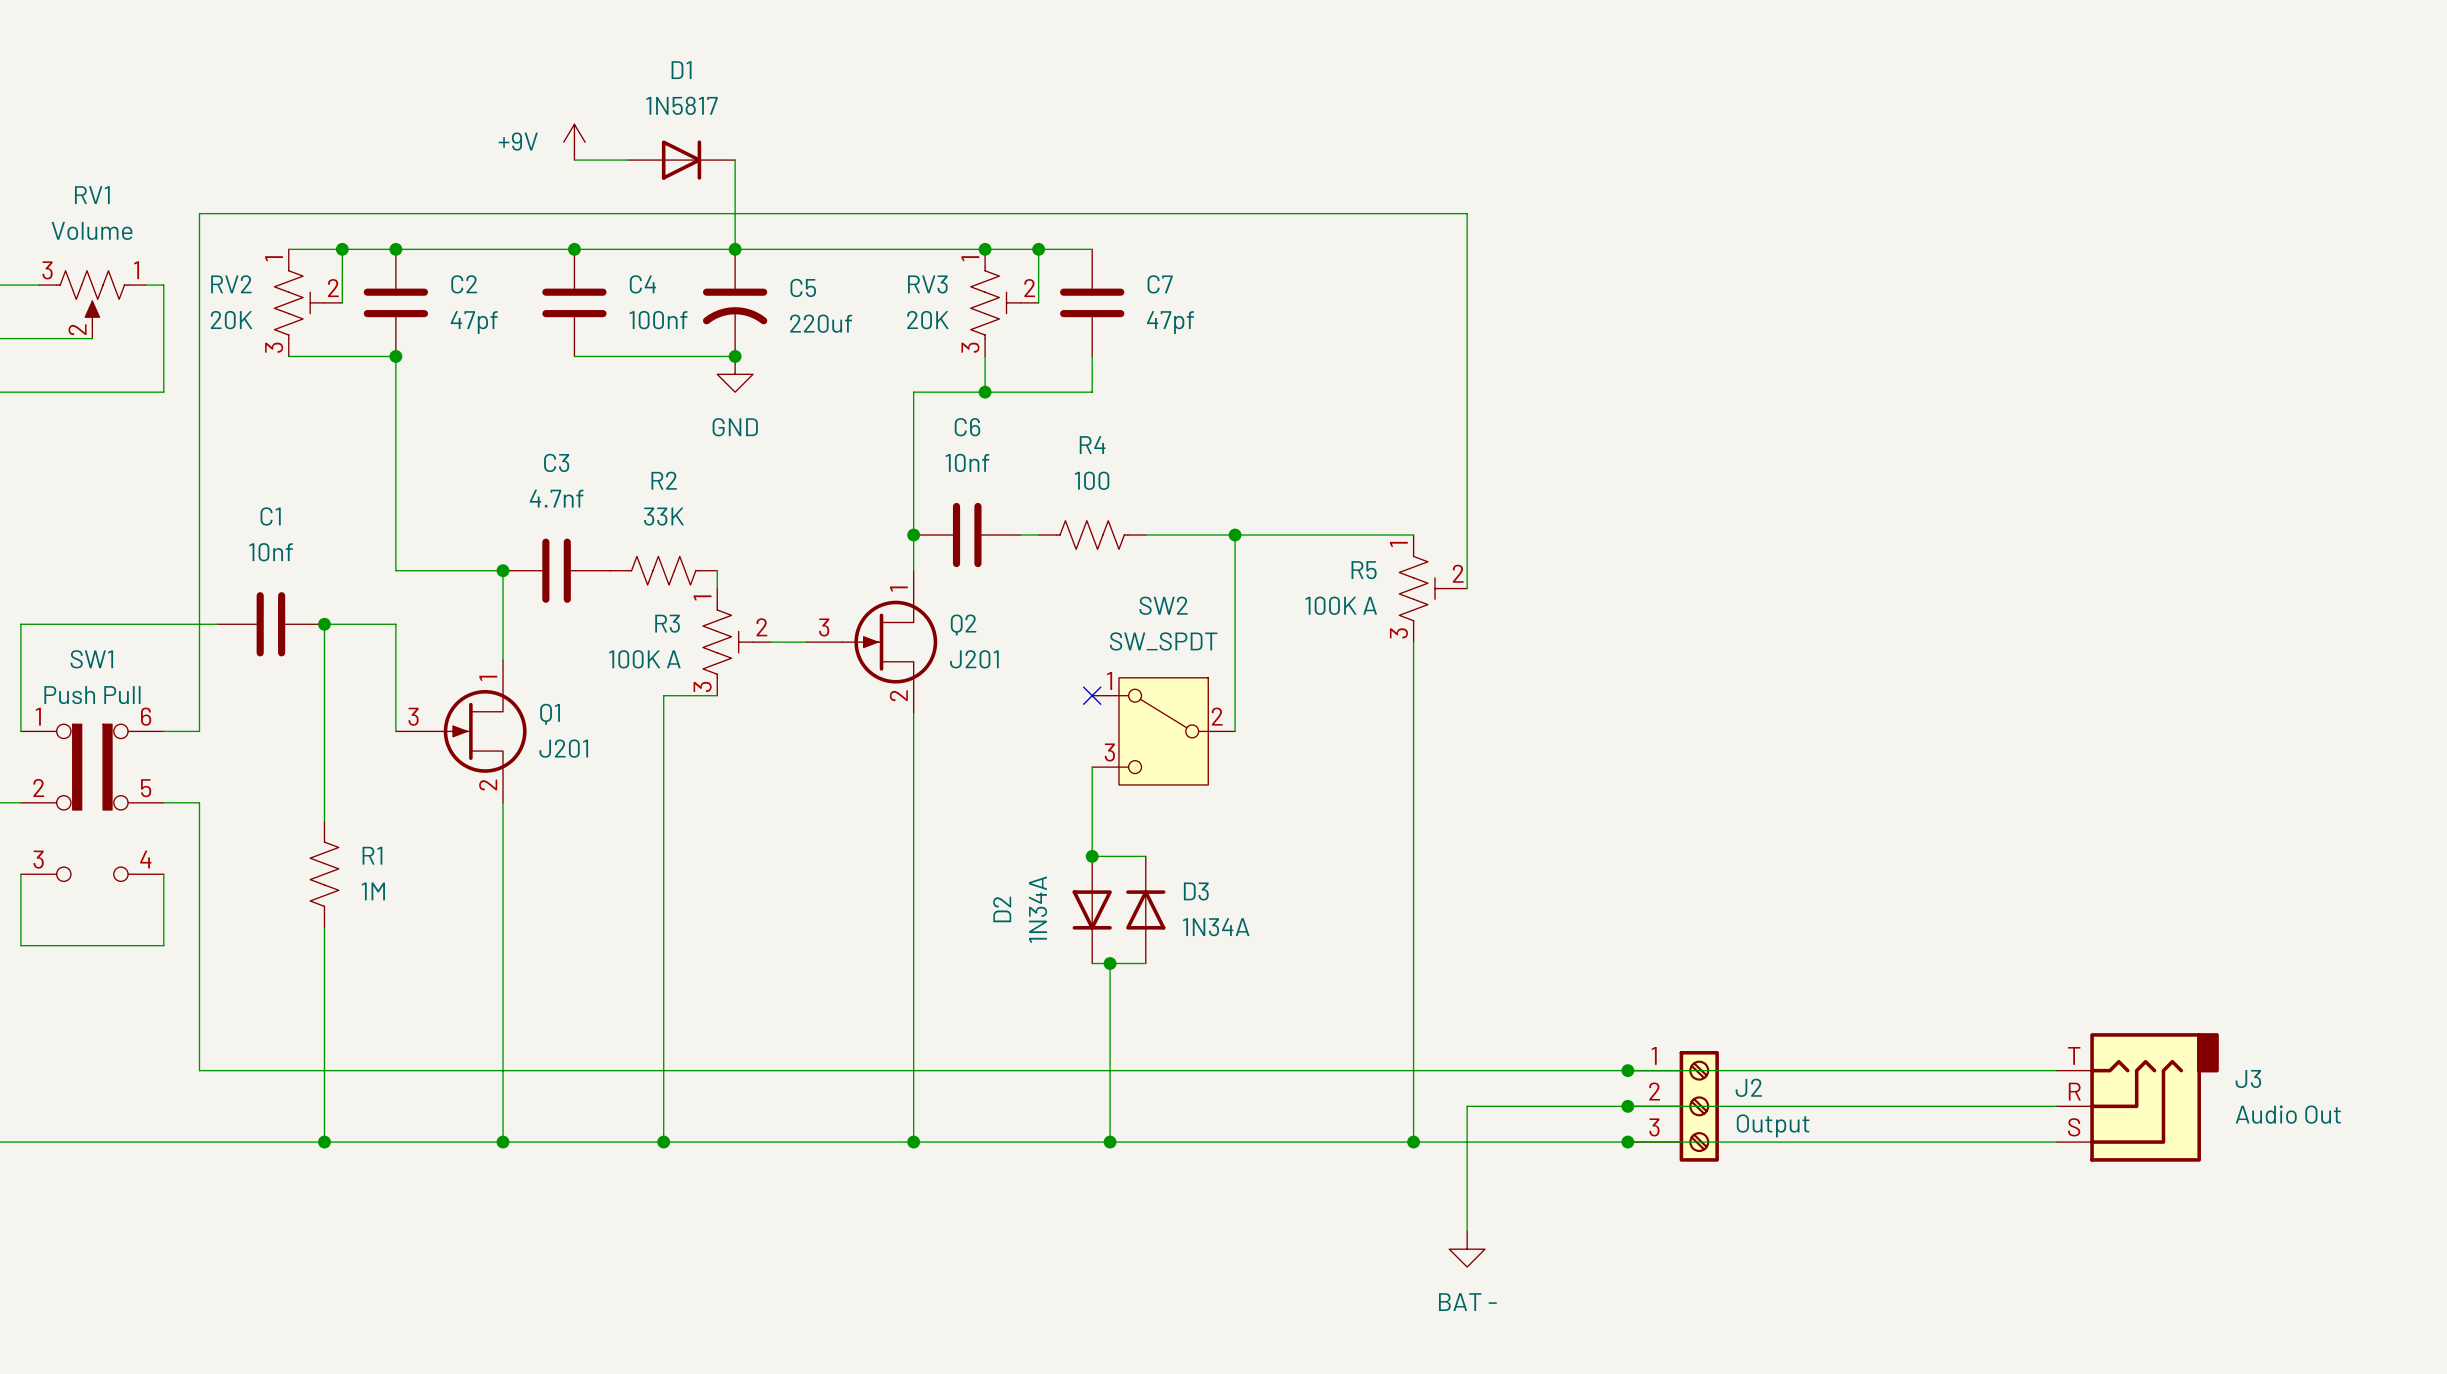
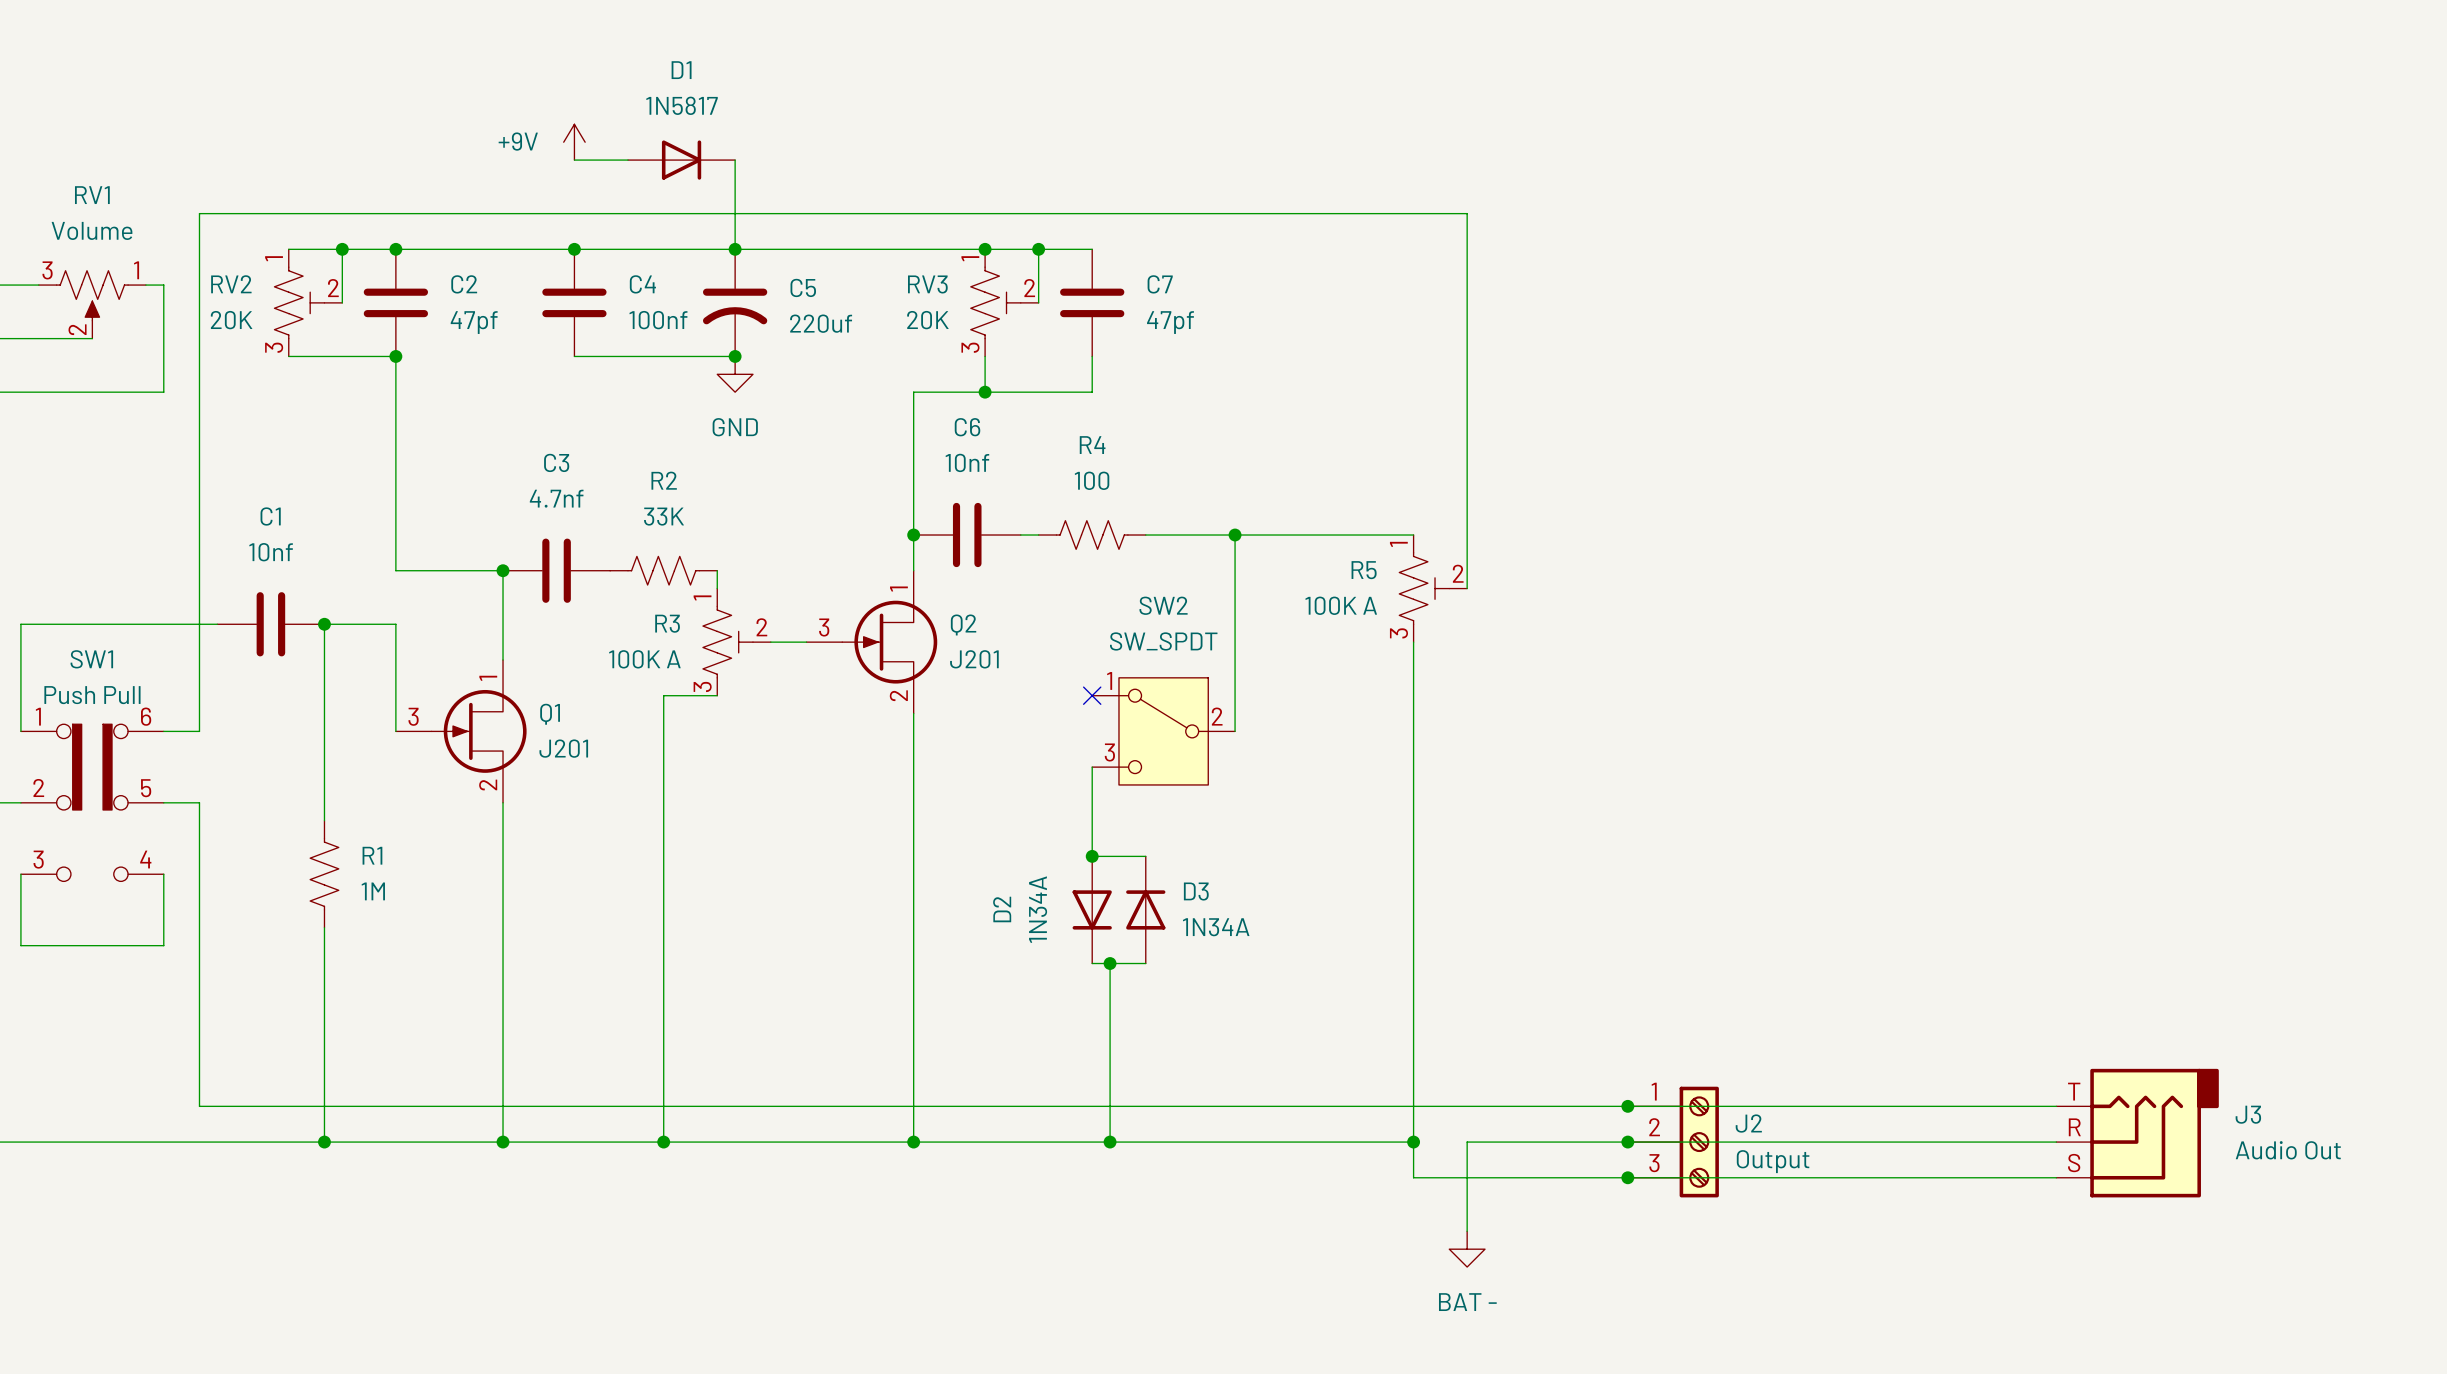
wire: (199, 1070) (2056, 1070) -> (199, 1070) (199, 1106) (1467, 1106)
junction: (1627, 1070) -> none
J3 position: (2137, 1097) -> (2137, 1133)
wire: (1467, 1106) (1467, 1142) (1413, 1142) -> (2056, 1177) (1413, 1177) (1413, 1142)
J2 position: (1673, 1106) -> (1673, 1142)
junction: none -> (1627, 1177)

